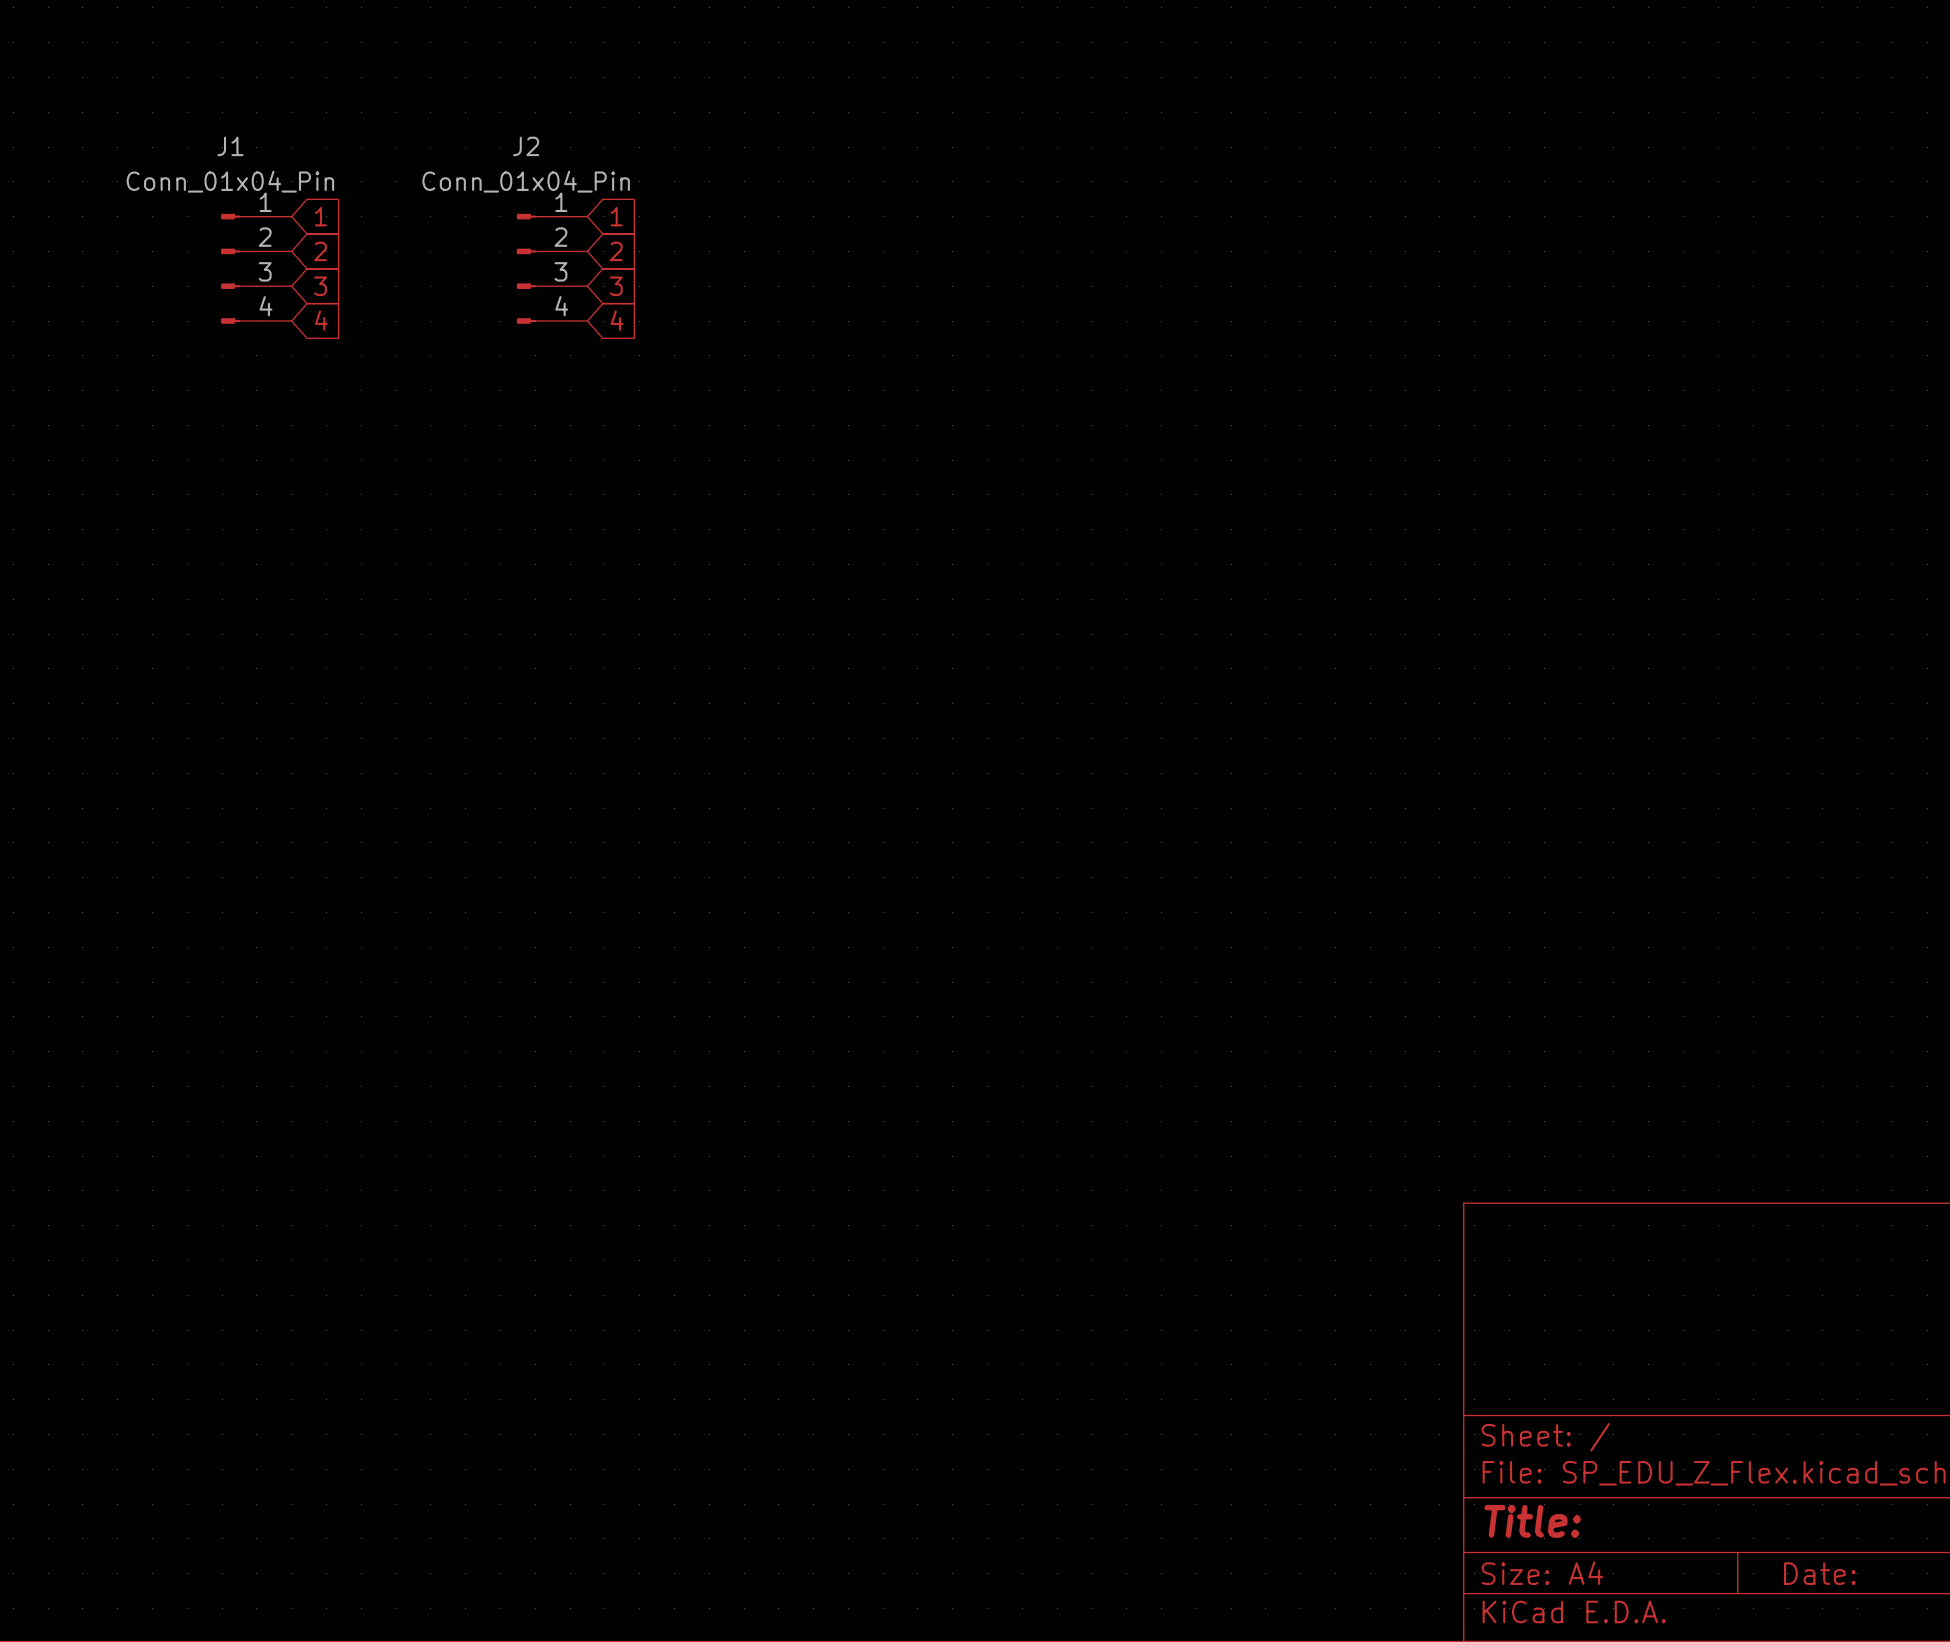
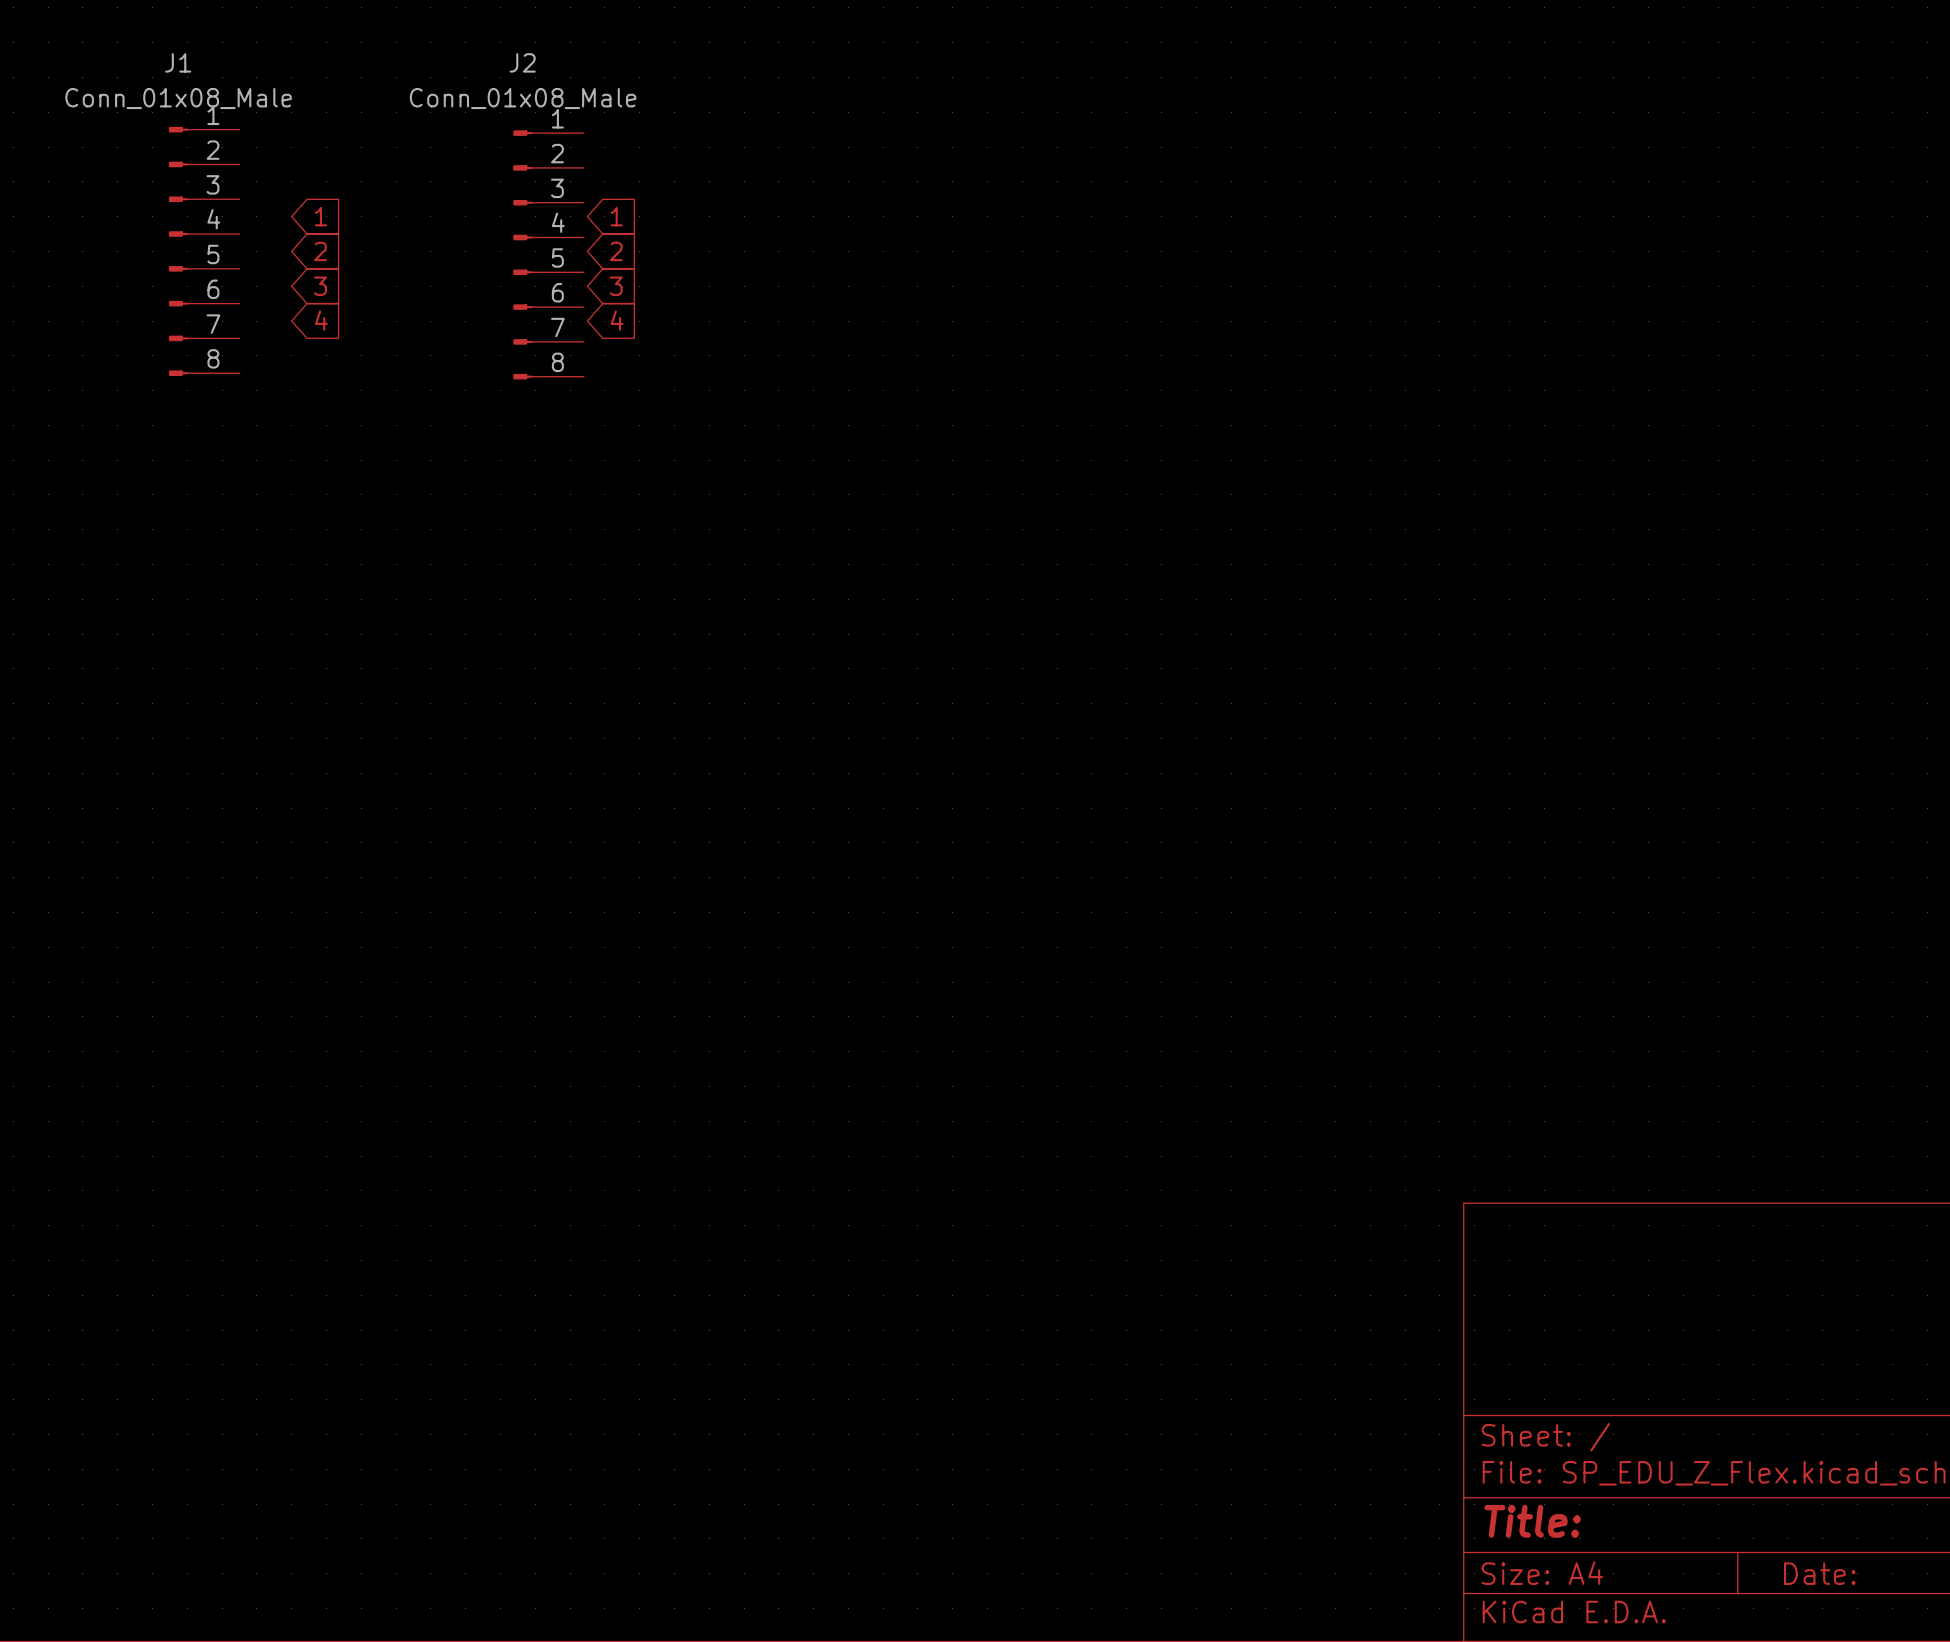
J1 name position: J1 (230, 146) -> J1 (178, 62)
J2 name position: J2 (526, 146) -> J2 (522, 62)
J1 value: Conn_01x04_Pin (230, 181) -> Conn_01x08_Male (178, 98)
J2 value: Conn_01x04_Pin (526, 181) -> Conn_01x08_Male (523, 98)
J1 symbol: [221, 213, 292, 324] -> [168, 126, 240, 376]
J2 symbol: [516, 213, 588, 324] -> [513, 130, 584, 380]

